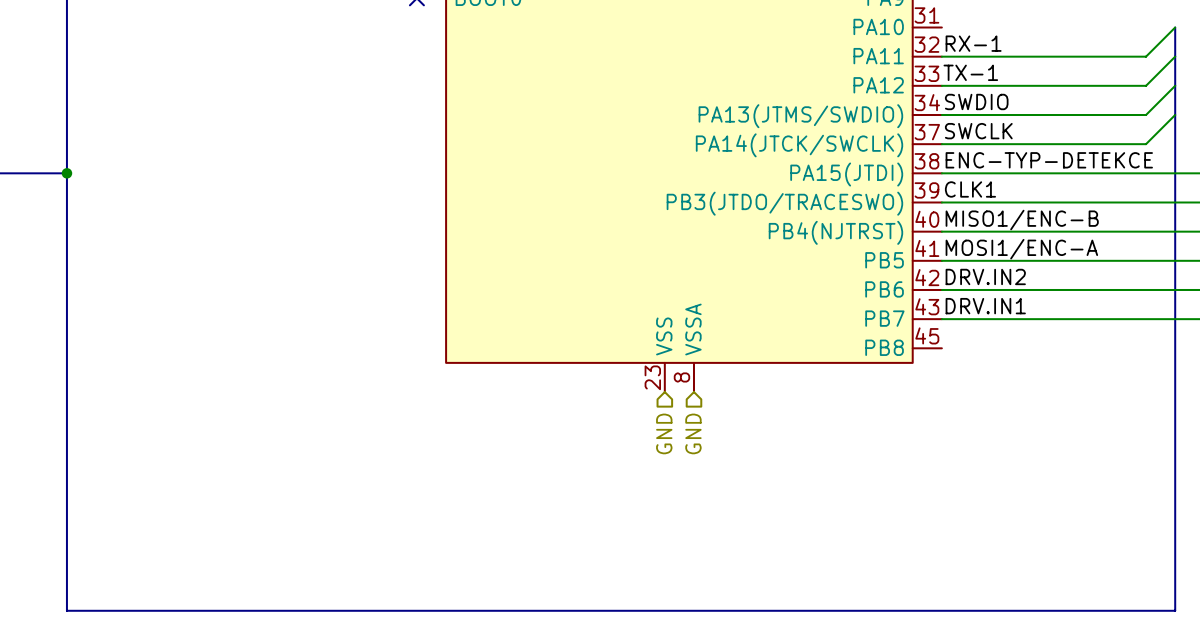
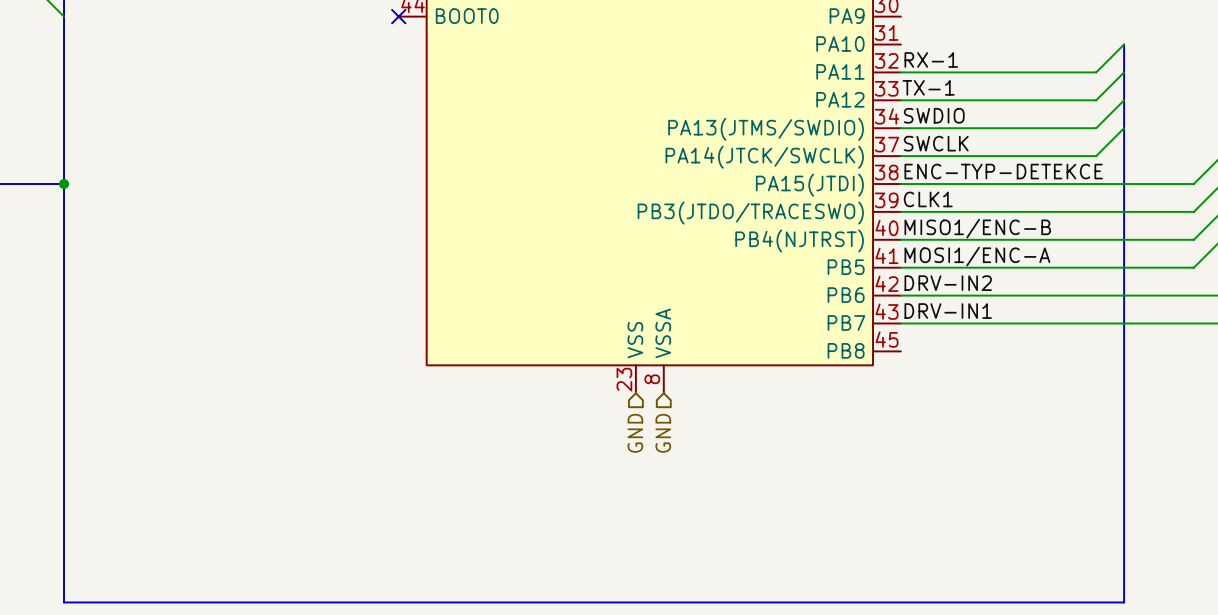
label: DRV.IN2 (985, 276) -> DRV-IN2 (948, 283)
label: DRV.IN1 (985, 306) -> DRV-IN1 (948, 311)

